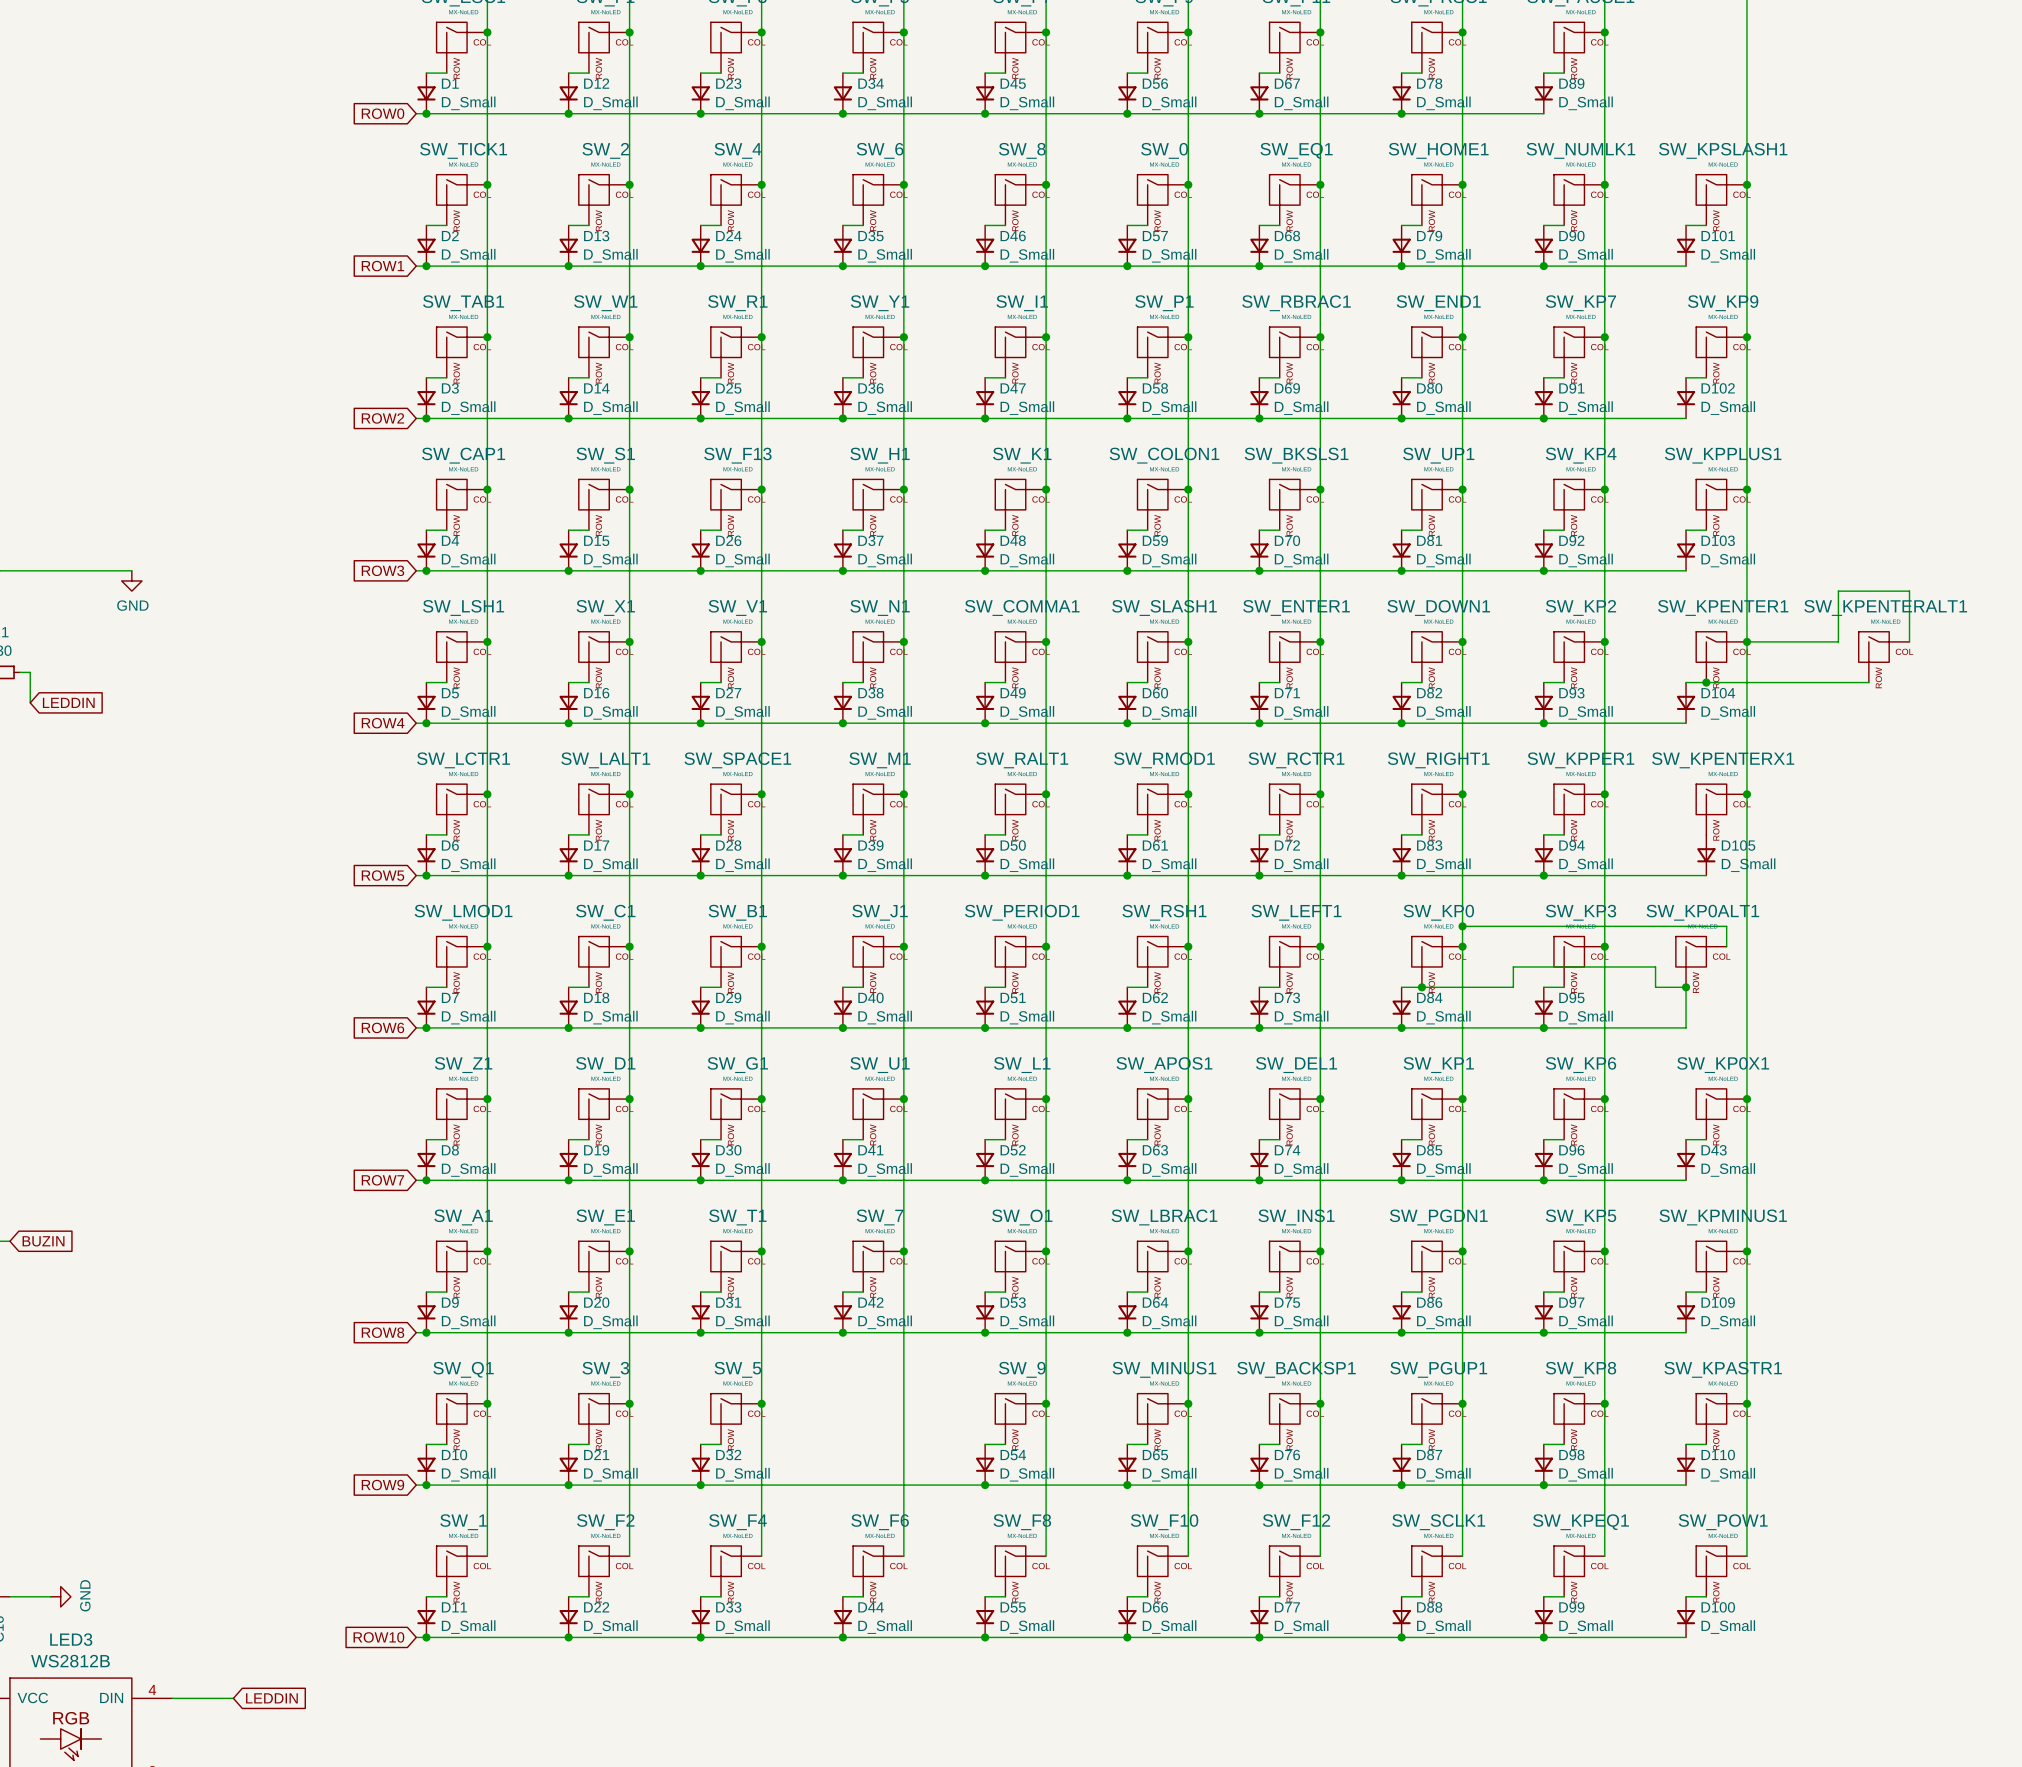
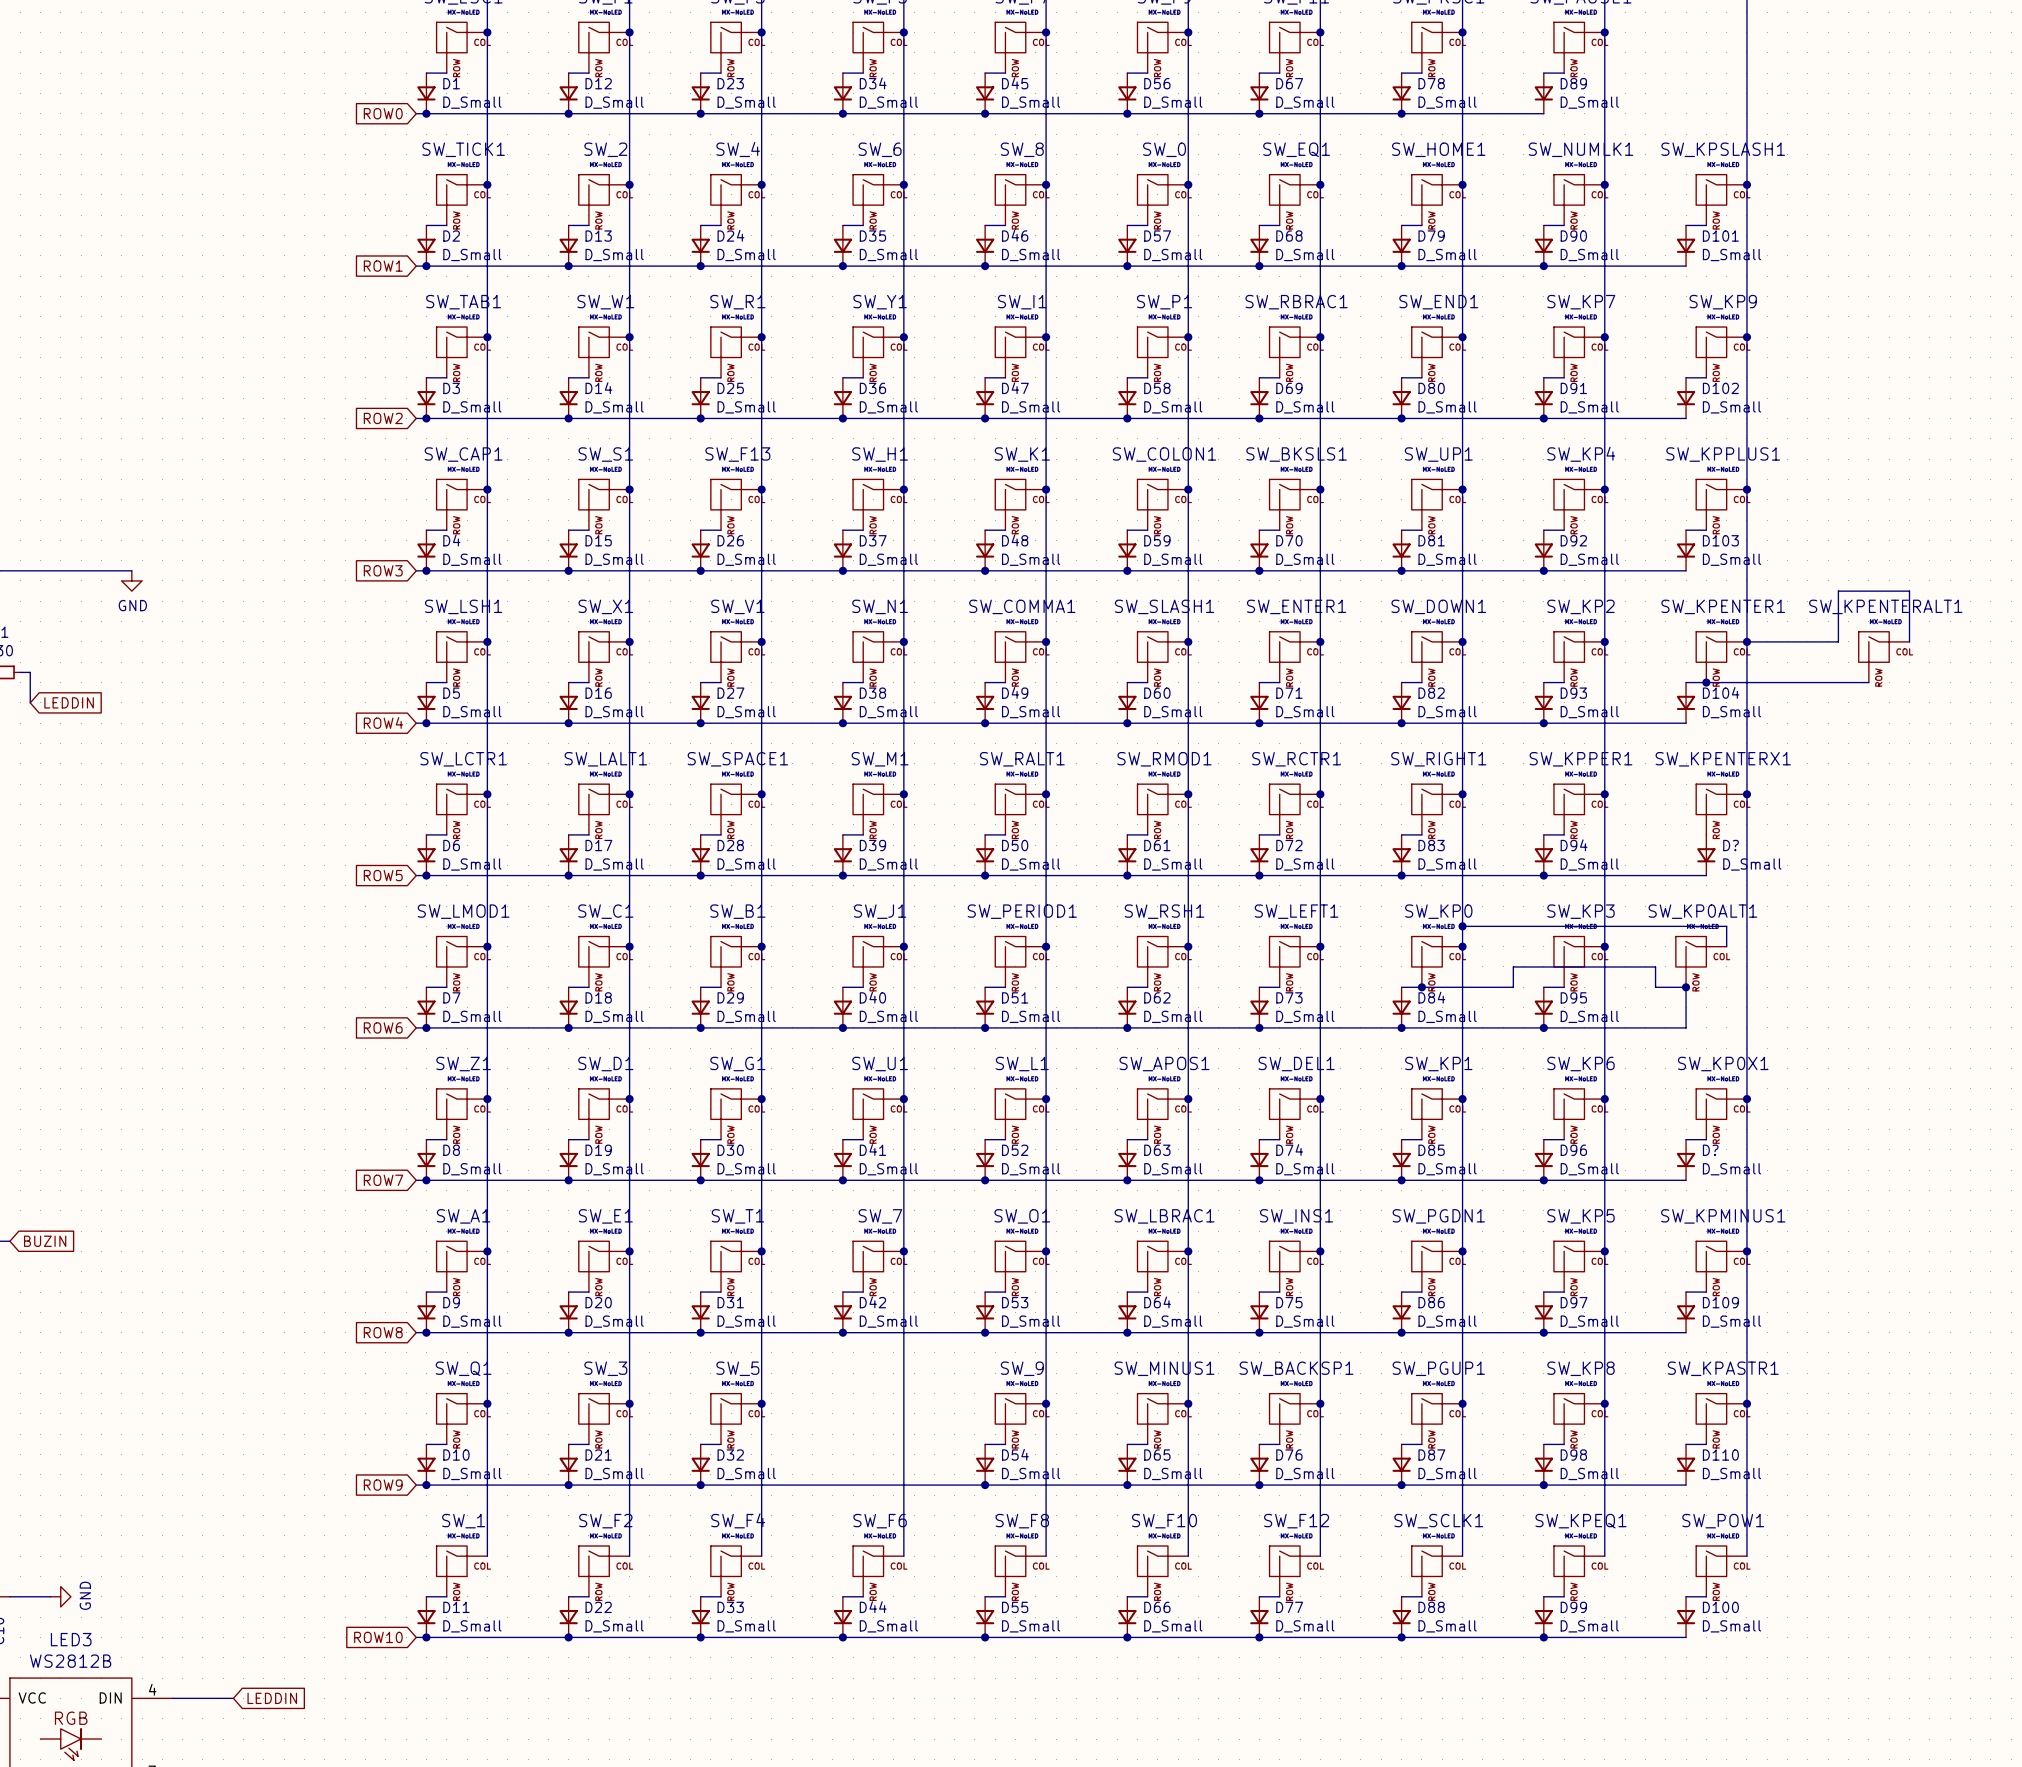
D105 name: D105 (1738, 845) -> D? (1731, 845)
D43 name: D43 (1714, 1150) -> D? (1710, 1150)

